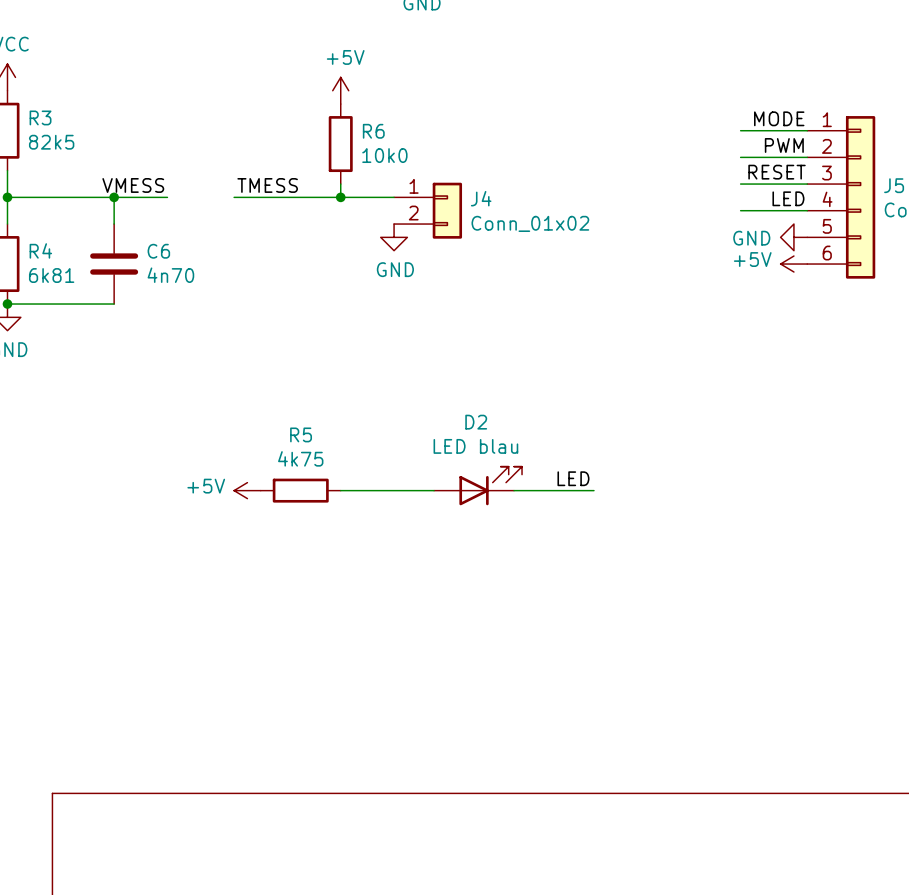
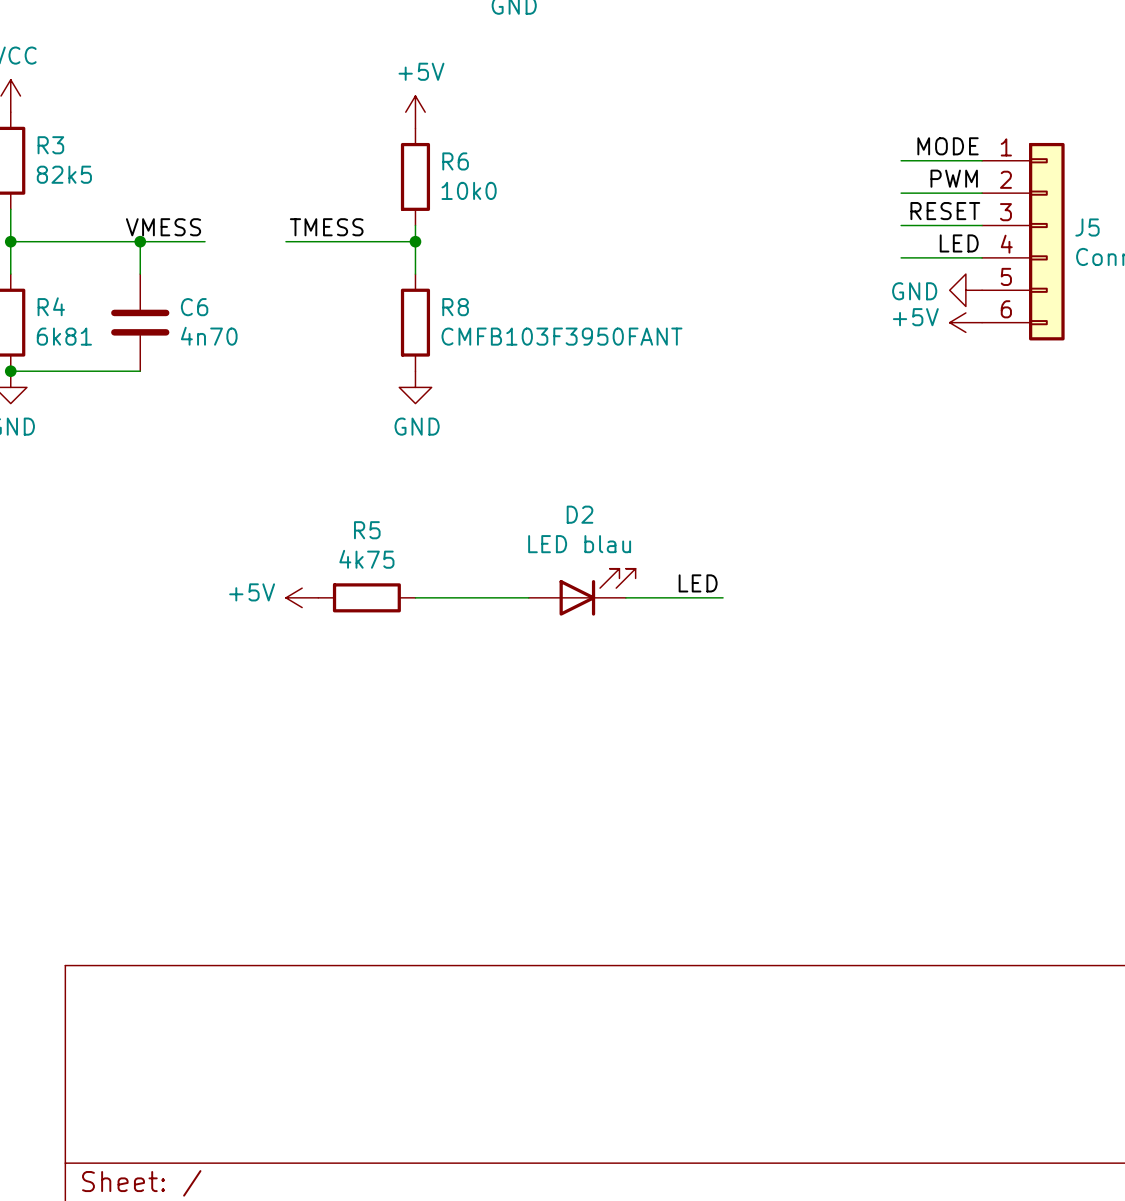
wire: (340, 197) (394, 197) -> (415, 241) (415, 274)
J4: Conn_01x02 (428, 210) -> none
power symbol position: GND (394, 237) -> GND (415, 387)
R8: none -> CMFB103F3950FANT (415, 322)

